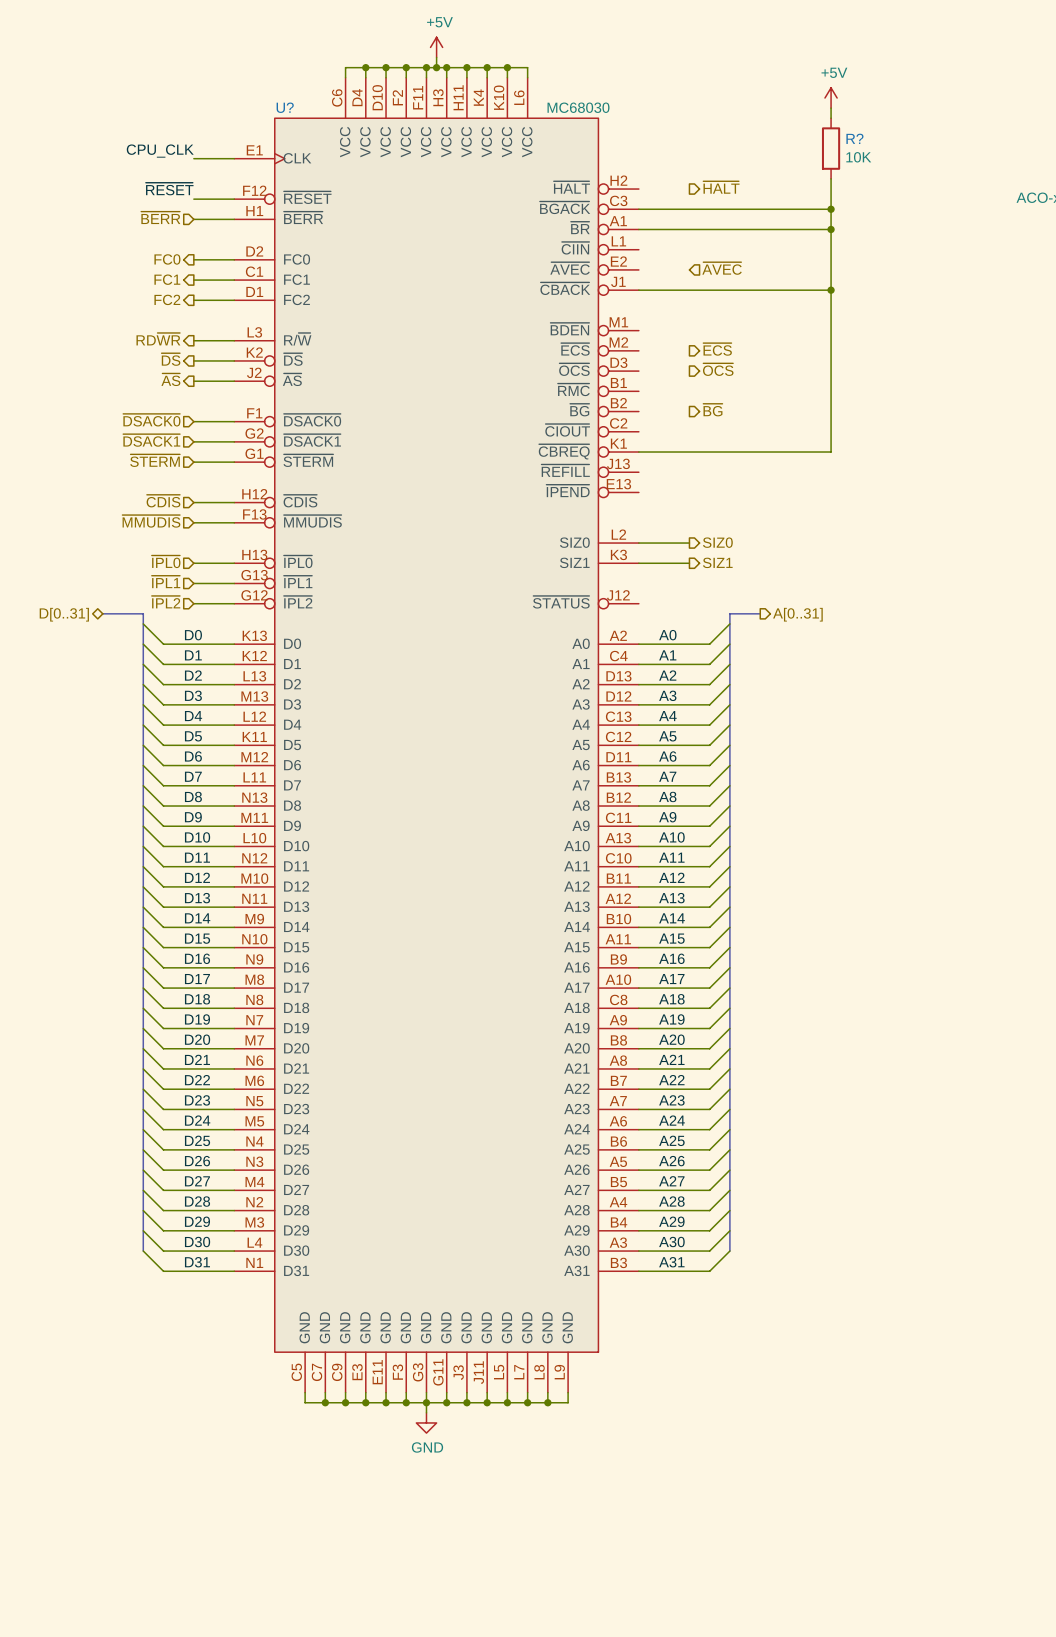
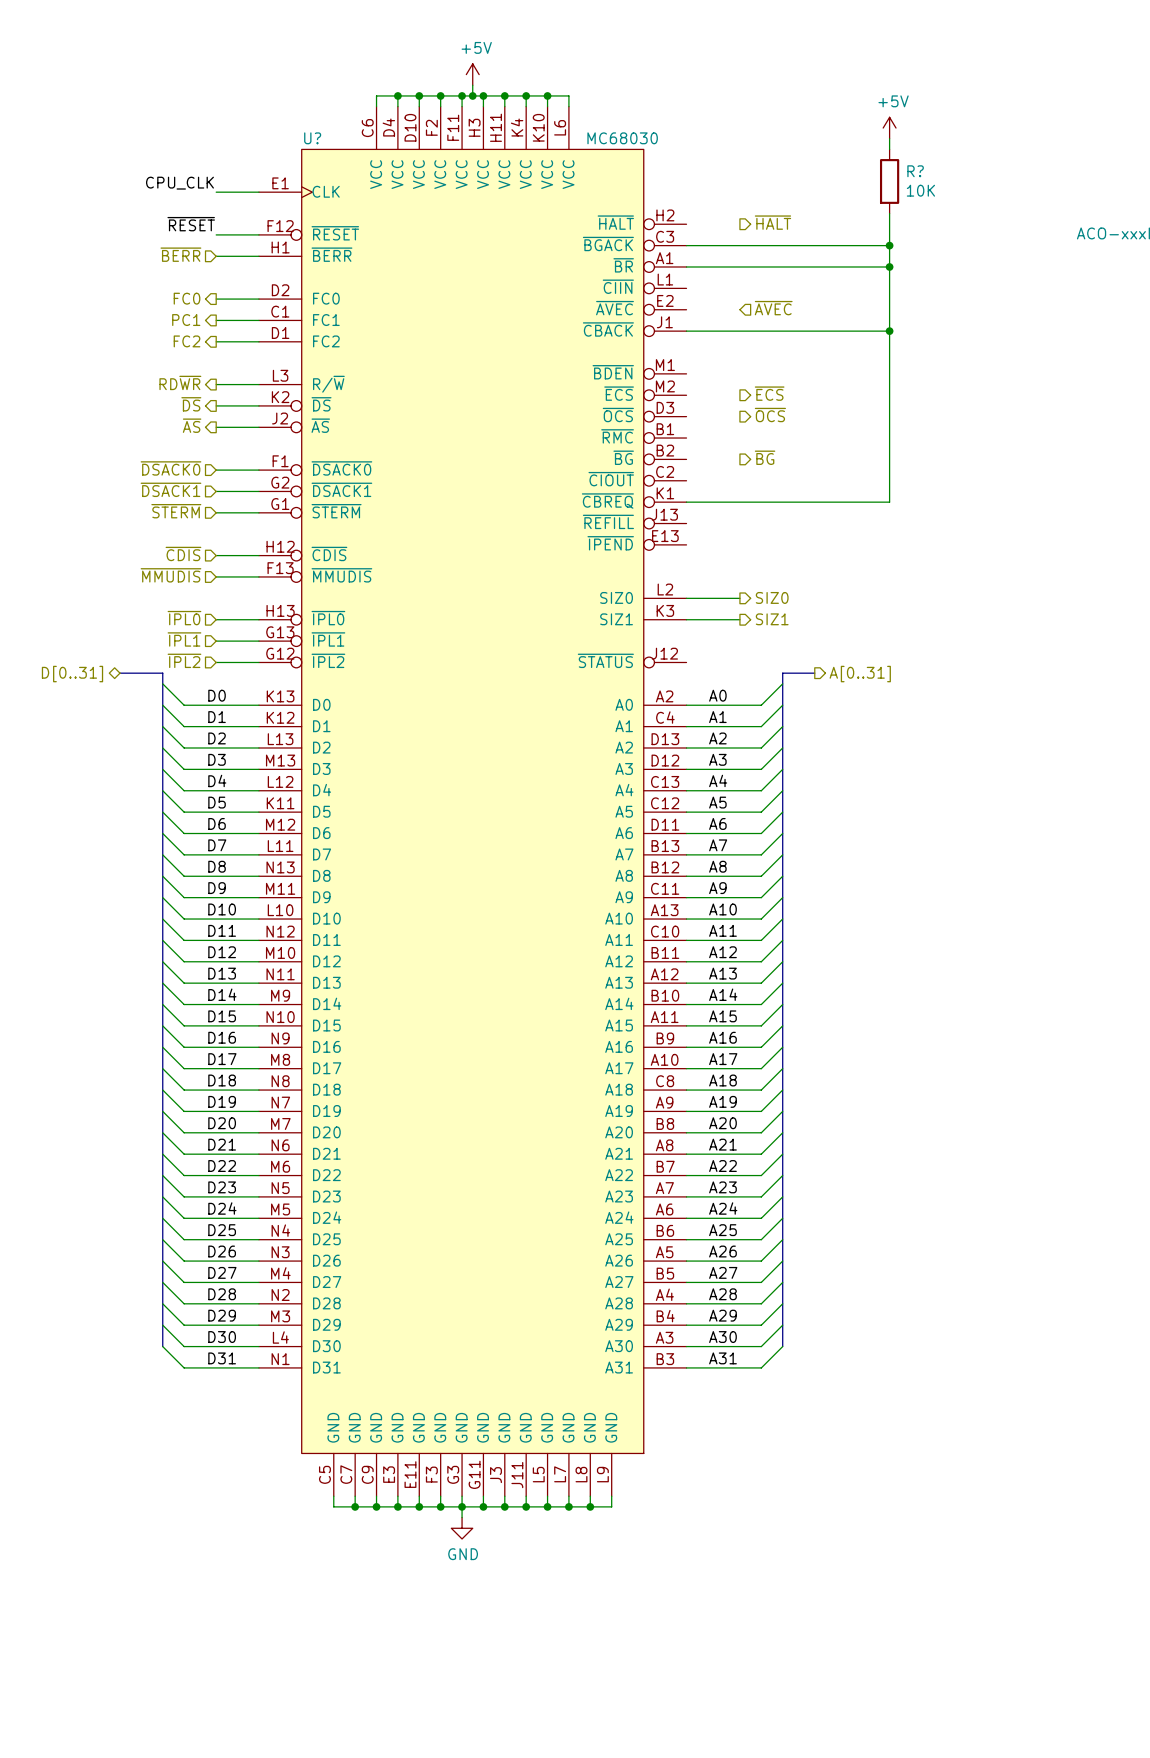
hierarchical label: FC1 (167, 279) -> PC1 (186, 320)

